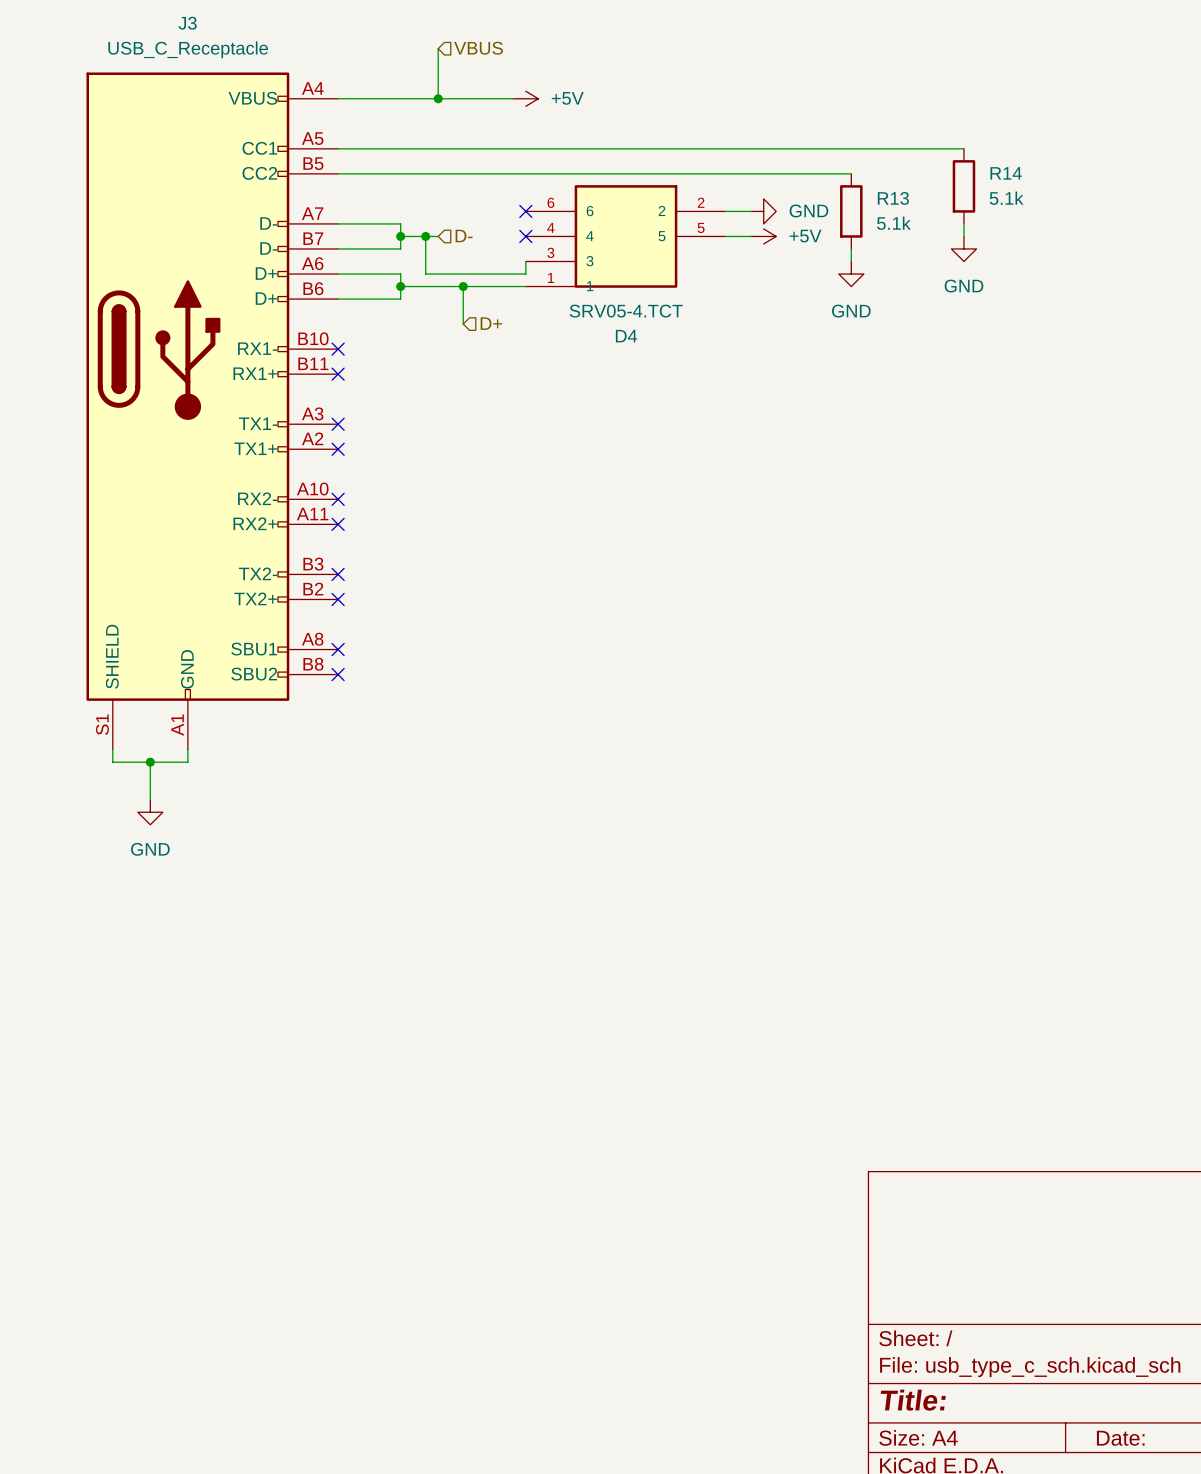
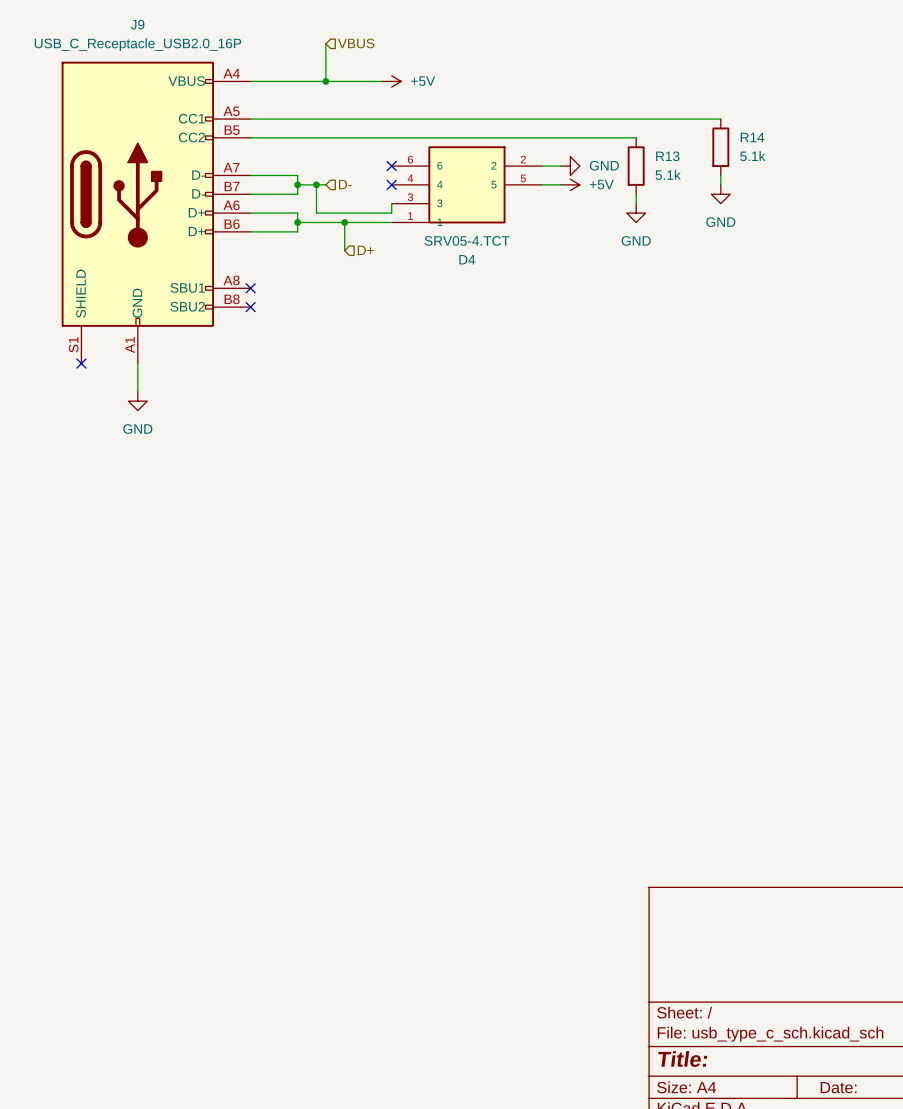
J9: none -> USB_C_Receptacle_USB2.0_16P (156, 212)
no-connect mark: (338, 349) -> none
no-connect mark: none -> (250, 307)
J3: USB_C_Receptacle (212, 411) -> none
no-connect mark: (338, 424) -> none
no-connect mark: (338, 449) -> none
no-connect mark: none -> (81, 363)
no-connect mark: (338, 499) -> none
power symbol: none -> GND (137, 401)
no-connect mark: (338, 524) -> none
no-connect mark: (338, 574) -> none
no-connect mark: (338, 599) -> none
no-connect mark: (338, 649) -> none
no-connect mark: (338, 674) -> none
wire: (112, 749) (112, 762) (187, 762) (187, 749) -> none
wire: (150, 762) (150, 799) -> none
junction: (150, 762) -> none
power symbol: GND (150, 812) -> none

